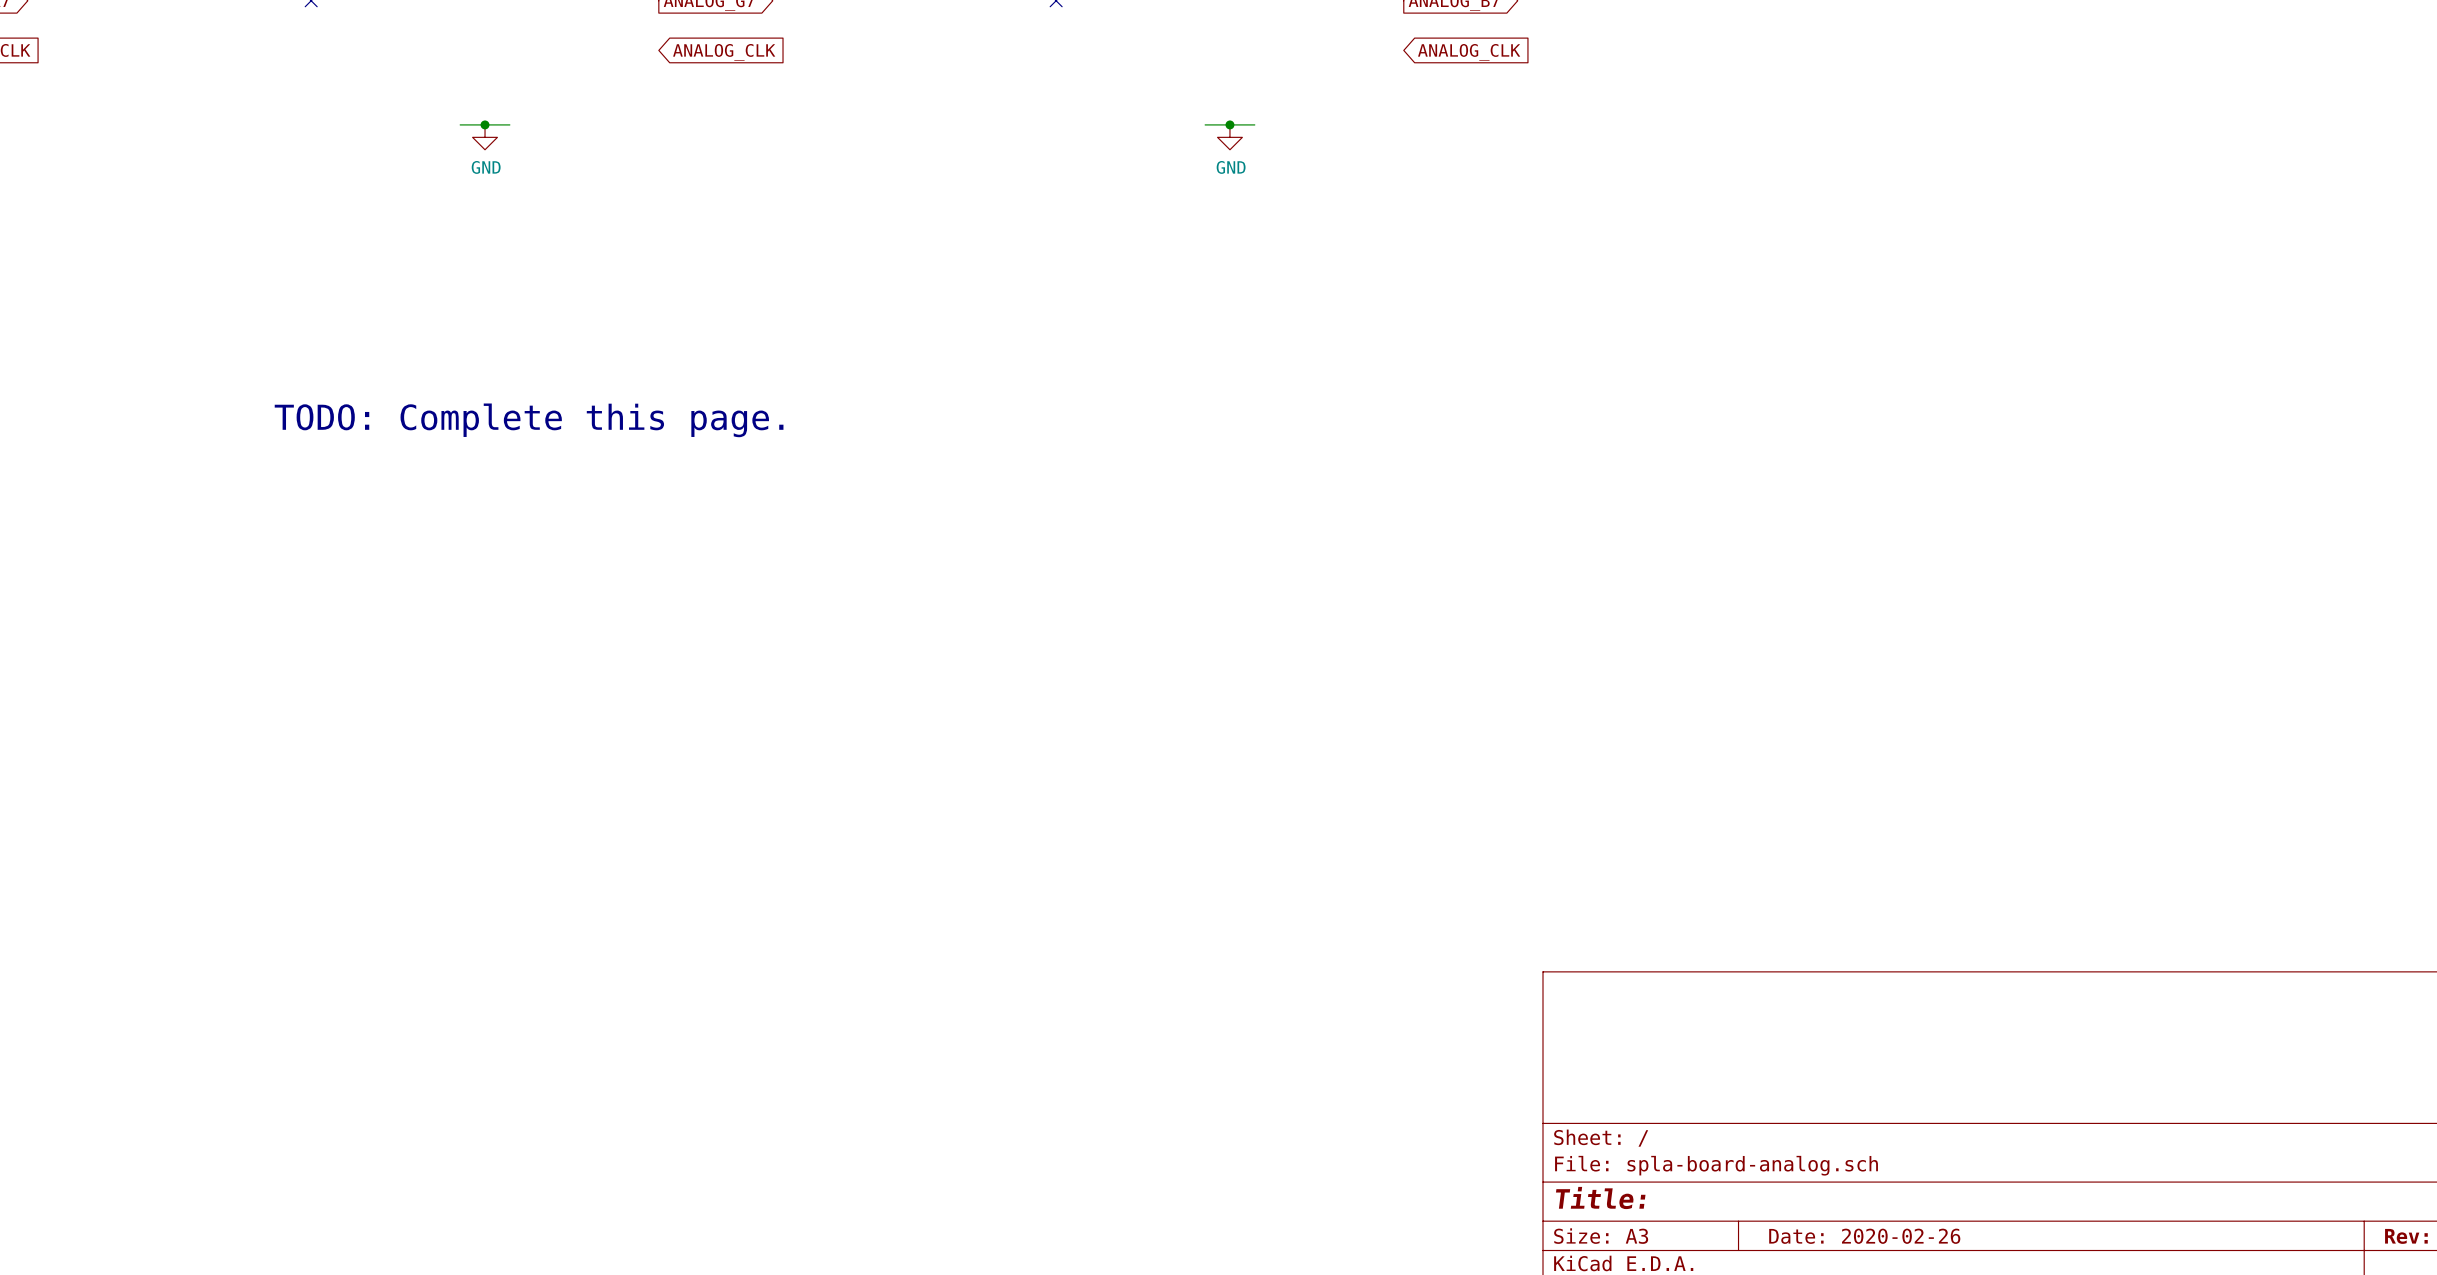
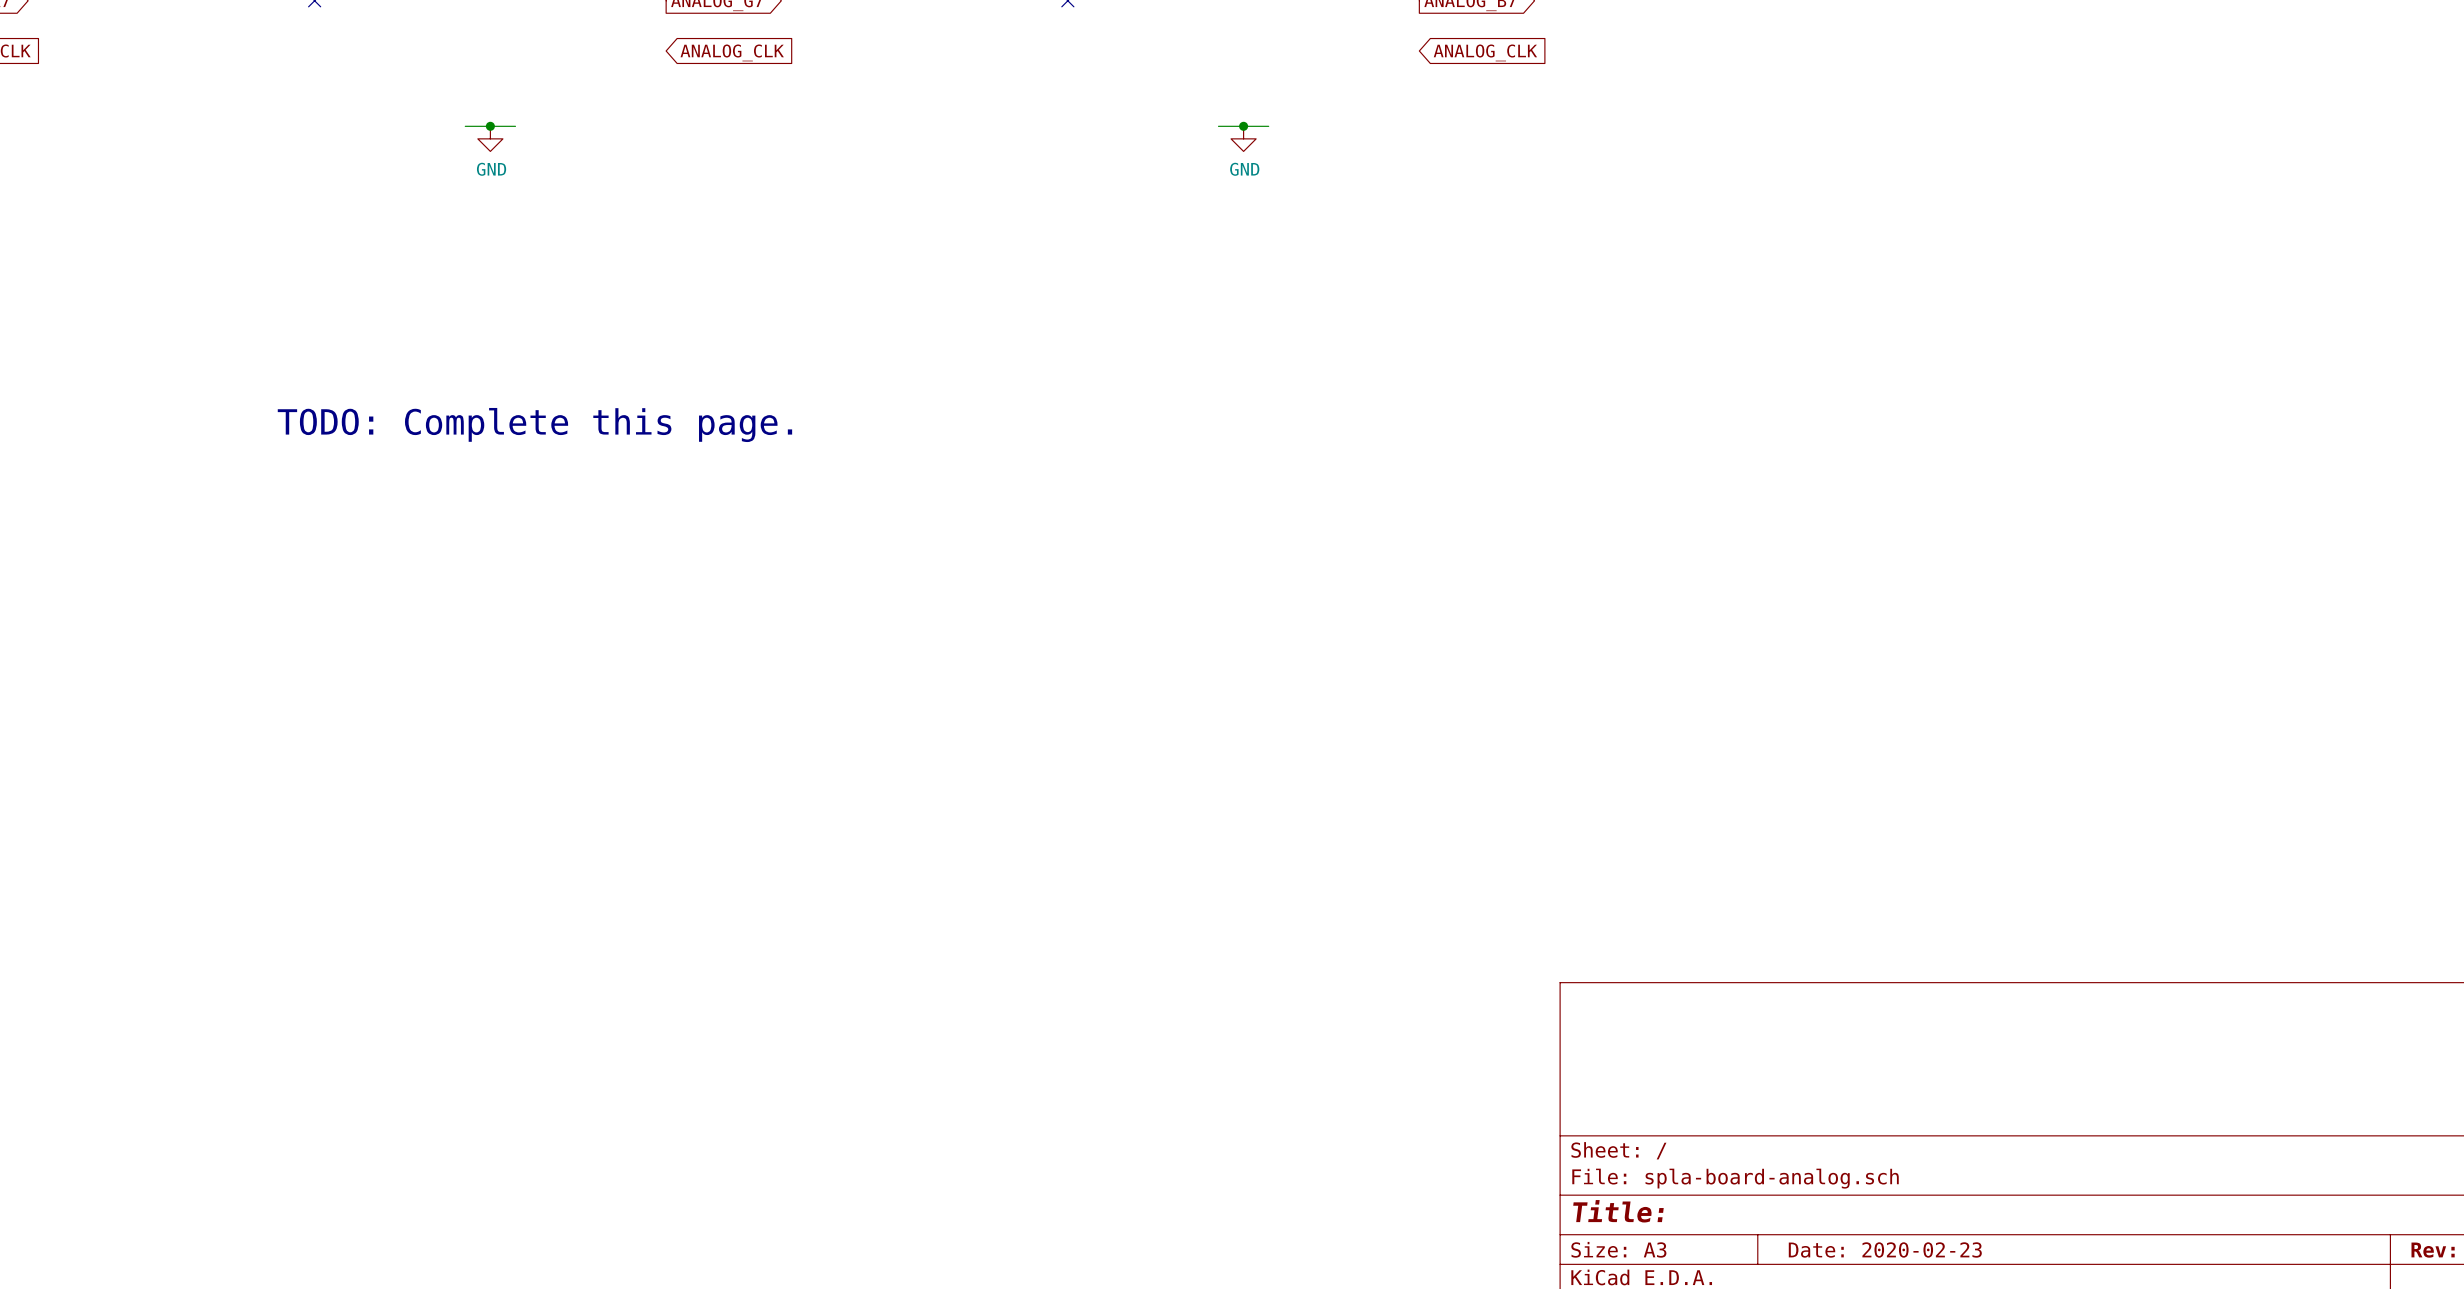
title block: Date: 2020-02-26 (1864, 1236) -> Date: 2020-02-23 (1885, 1249)

